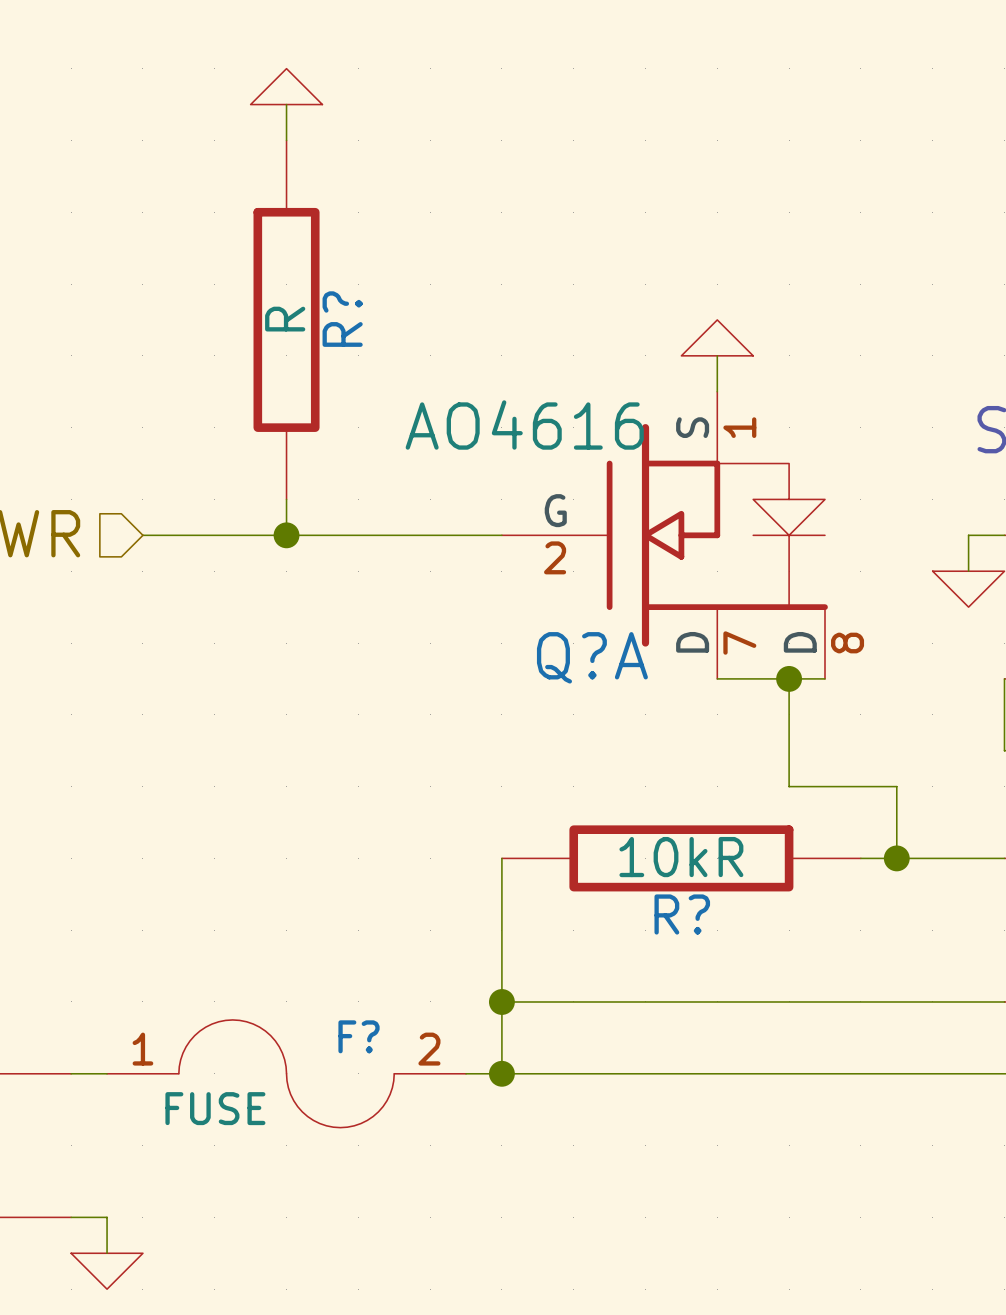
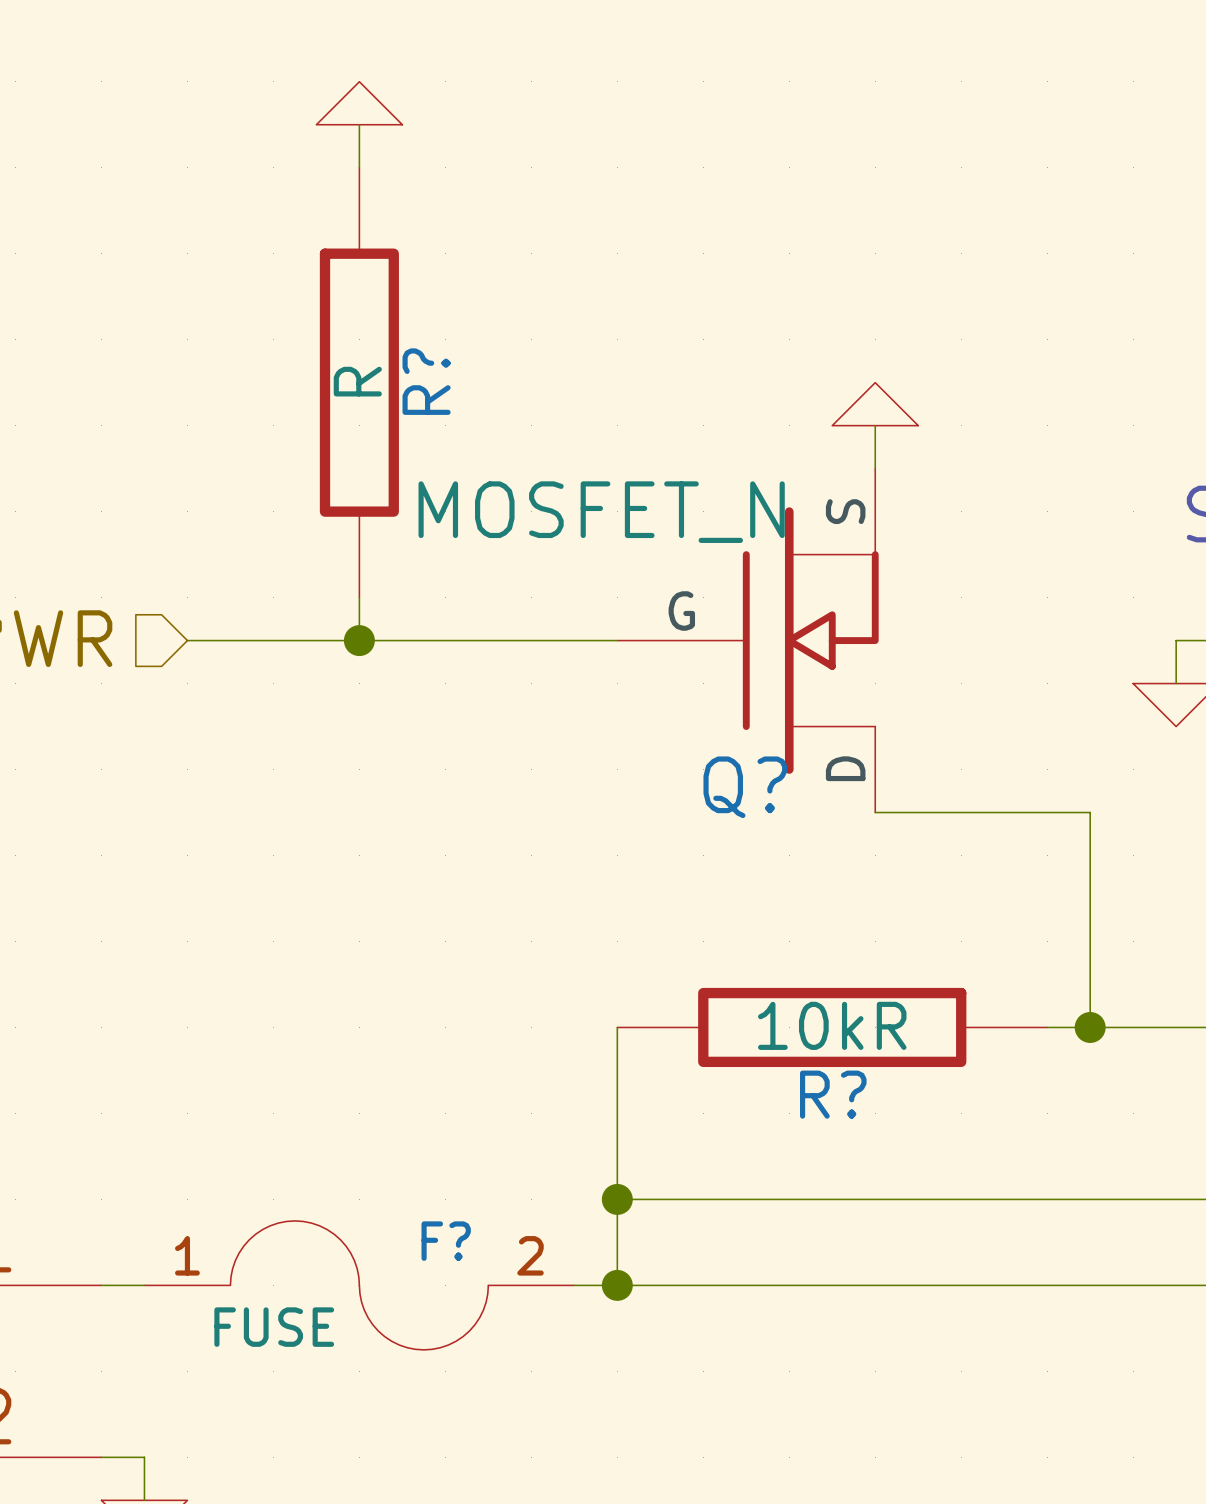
Q?: none -> MOSFET_N (748, 640)
Q?A: AO4616 (664, 535) -> none
wire: (789, 678) (789, 786) (896, 786) -> (1004, 812) (1090, 812) (1090, 941)
junction: (789, 678) -> none

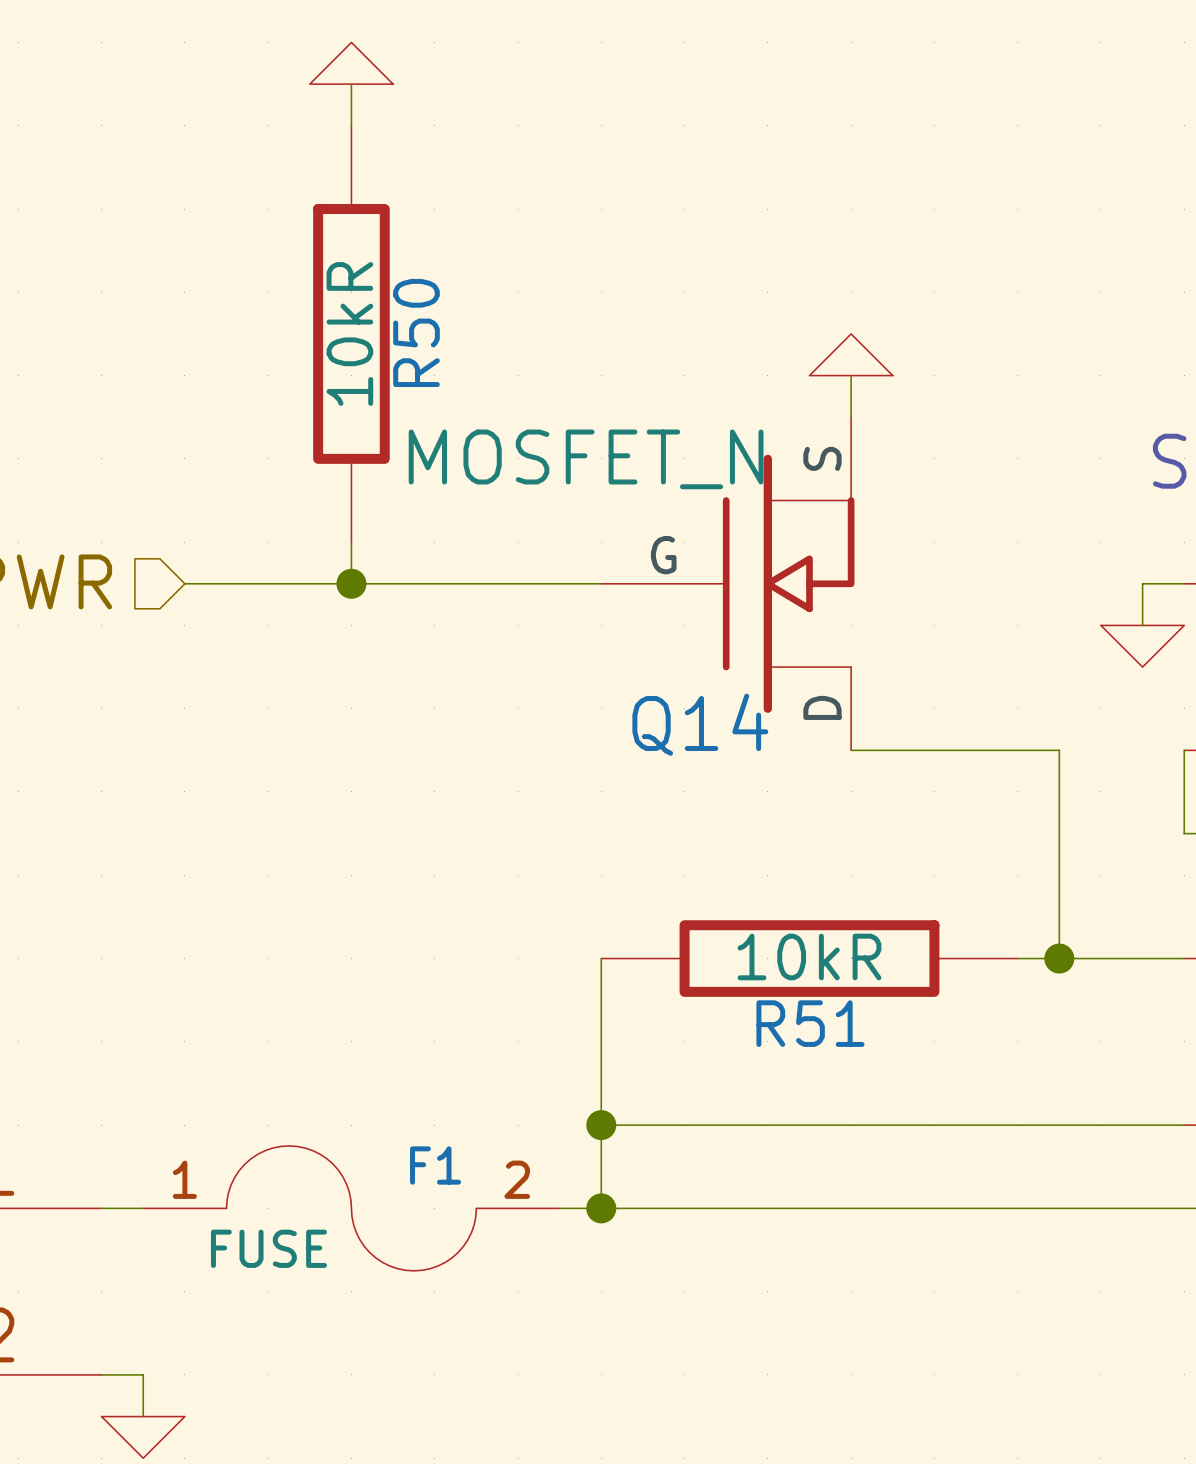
R? value: R (357, 381) -> 10kR (349, 333)
R? name: R? (426, 381) -> R50 (416, 332)
Q? name: Q? (745, 787) -> Q14 (700, 724)
R? name: R? (833, 1094) -> R51 (810, 1023)
F? name: F? (446, 1241) -> F1 (435, 1165)

